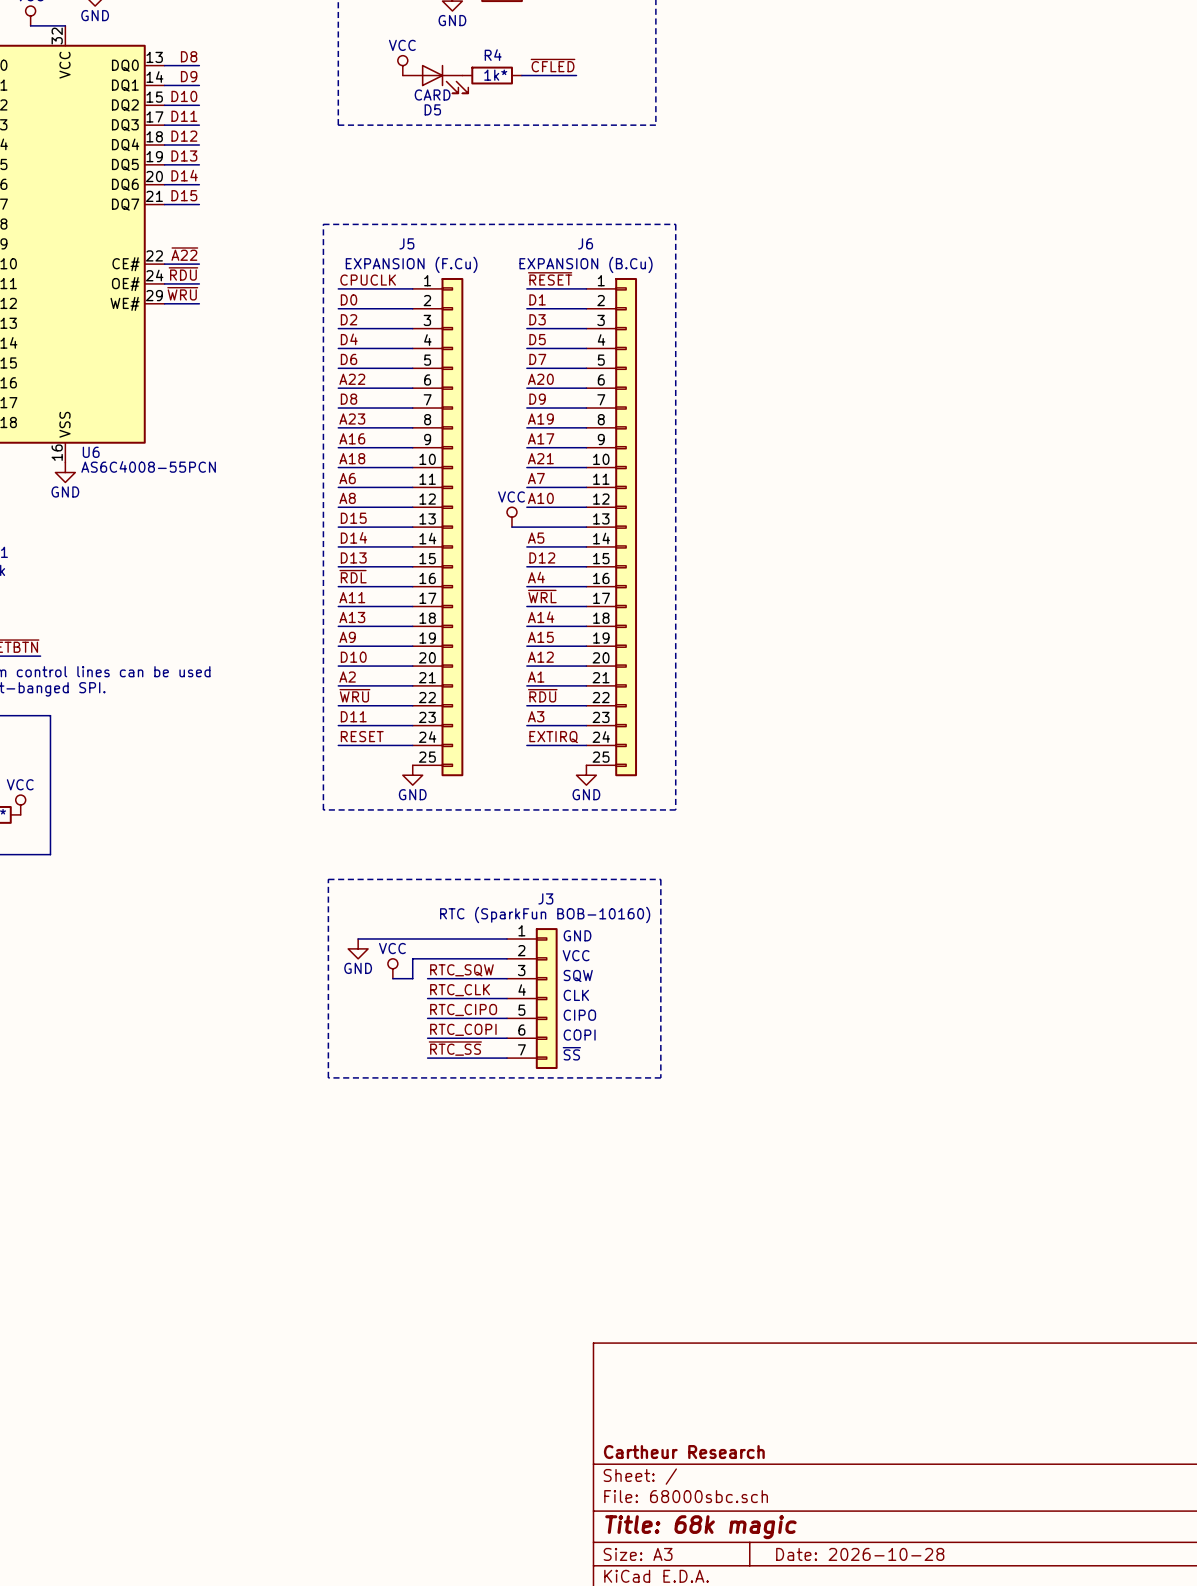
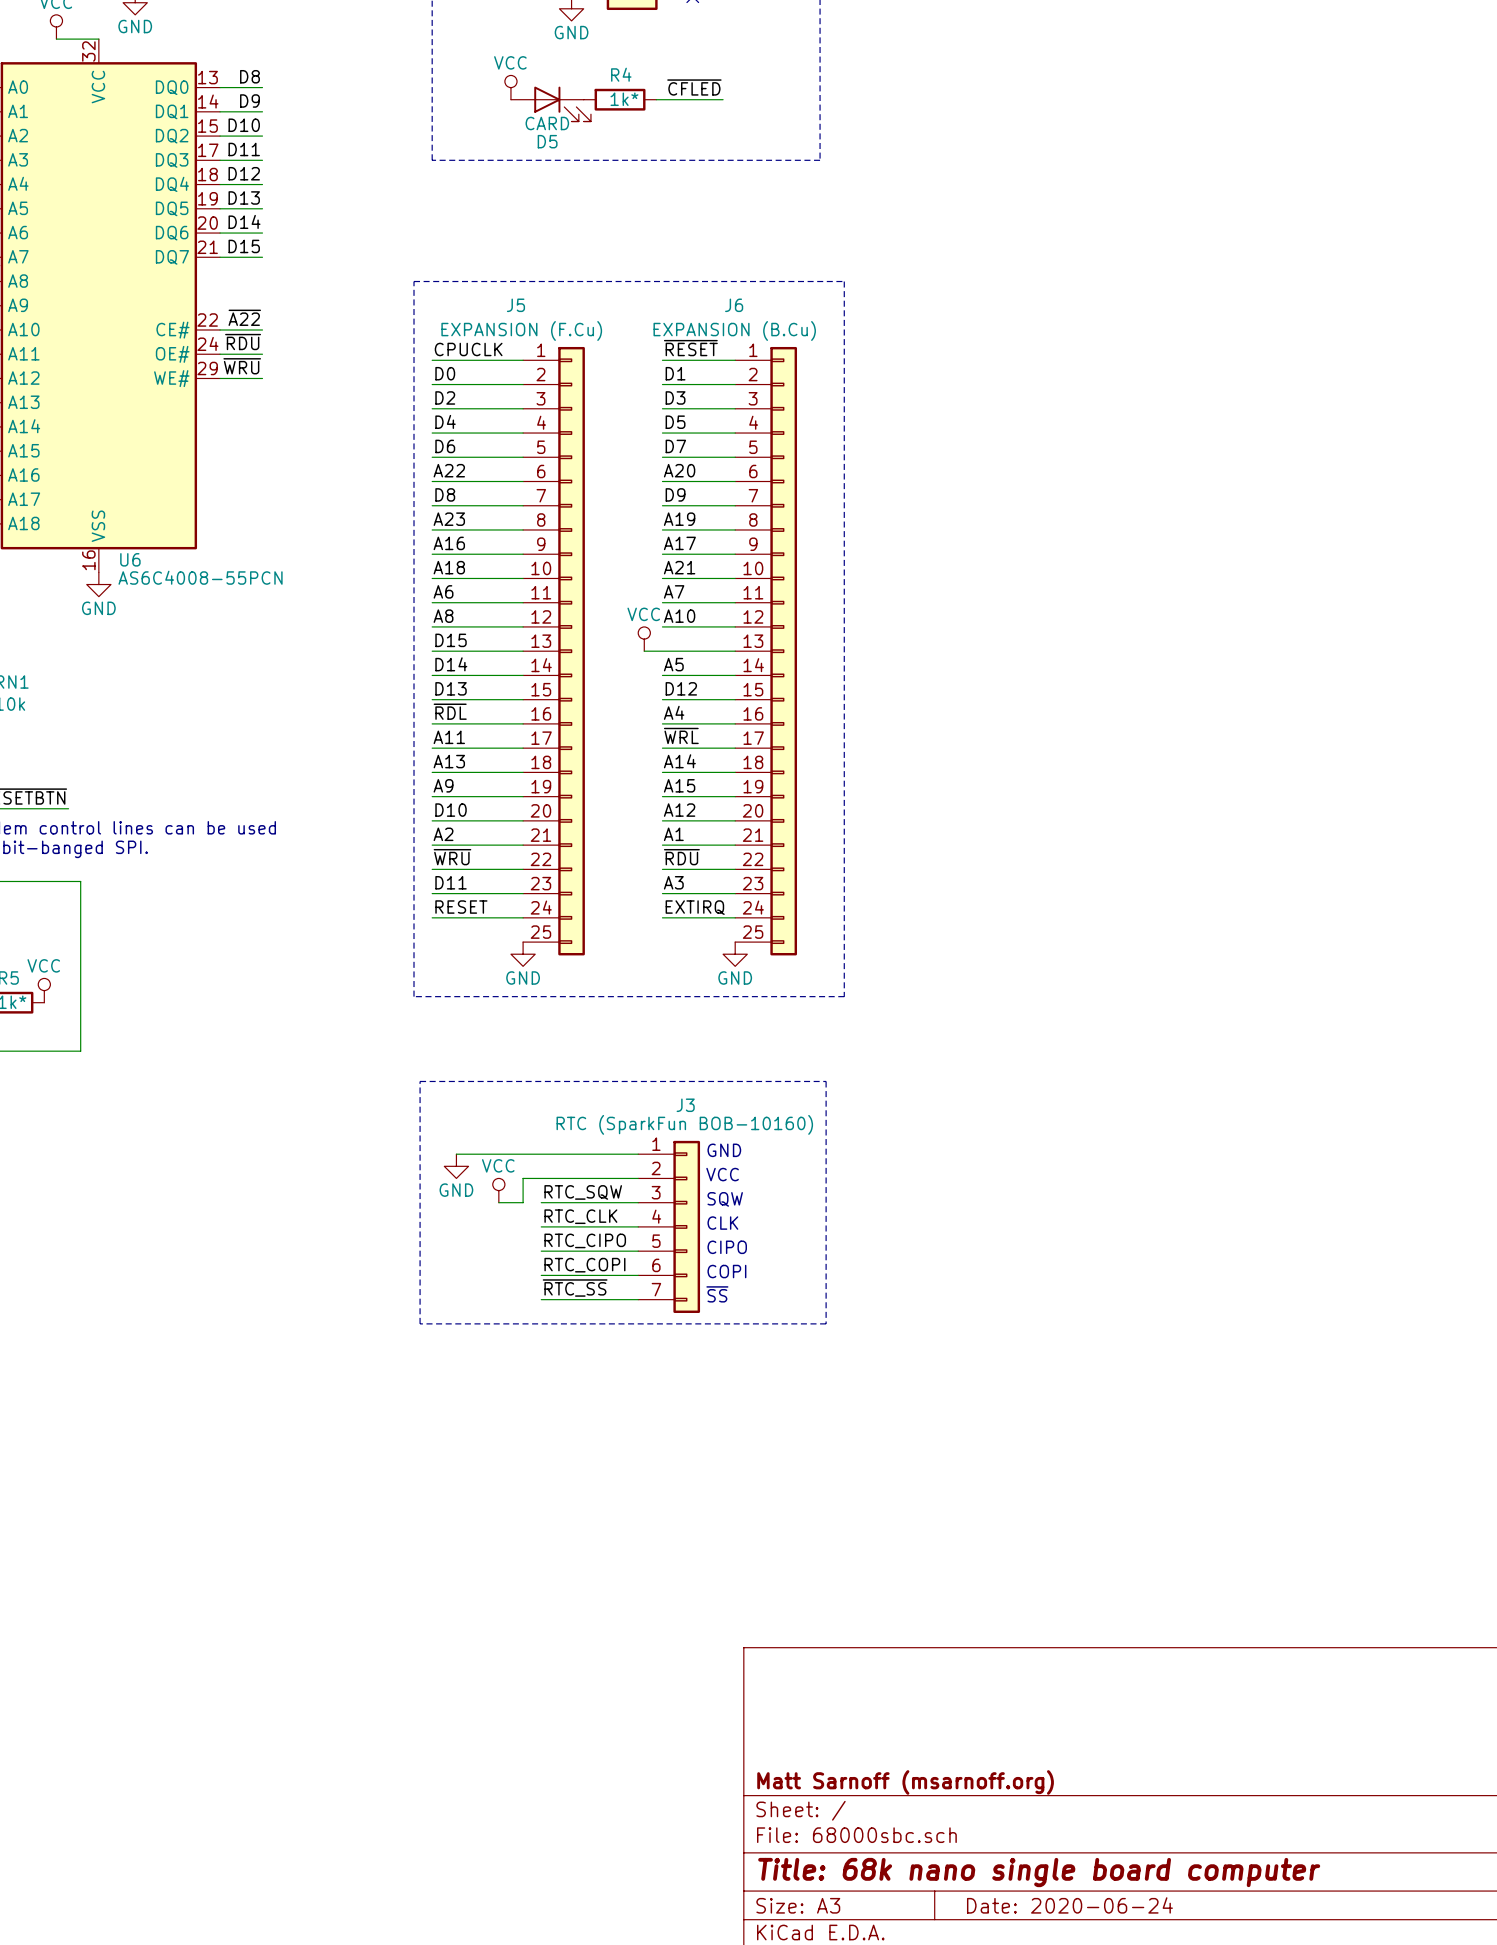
title block: Cartheur Research (684, 1452) -> Matt Sarnoff (msarnoff.org) (905, 1782)
title block: Title: 68k magic (700, 1527) -> Title: 68k nano single board computer (1039, 1872)
title block: Date: 2026-10-28 (860, 1554) -> Date: 2020-06-24 (1069, 1905)

